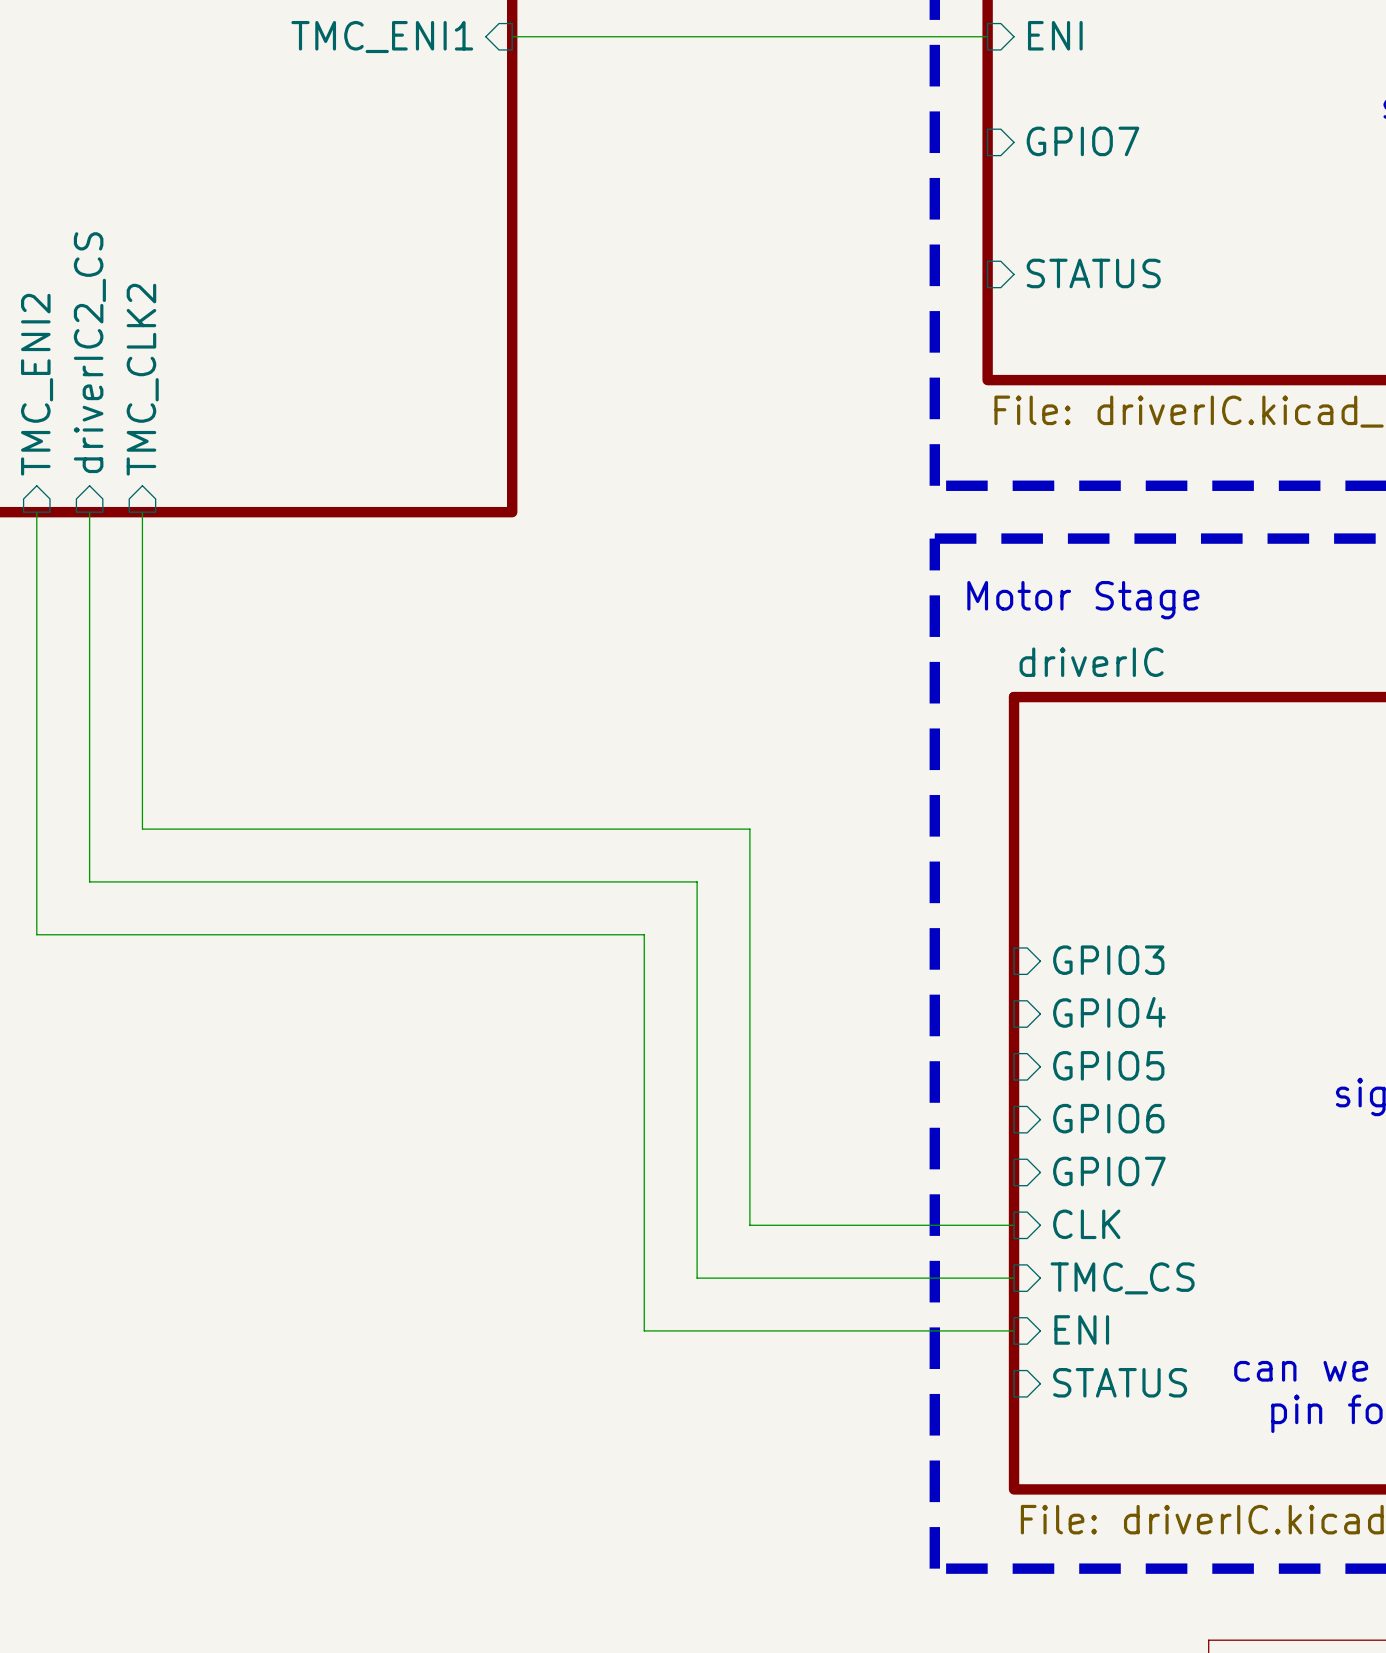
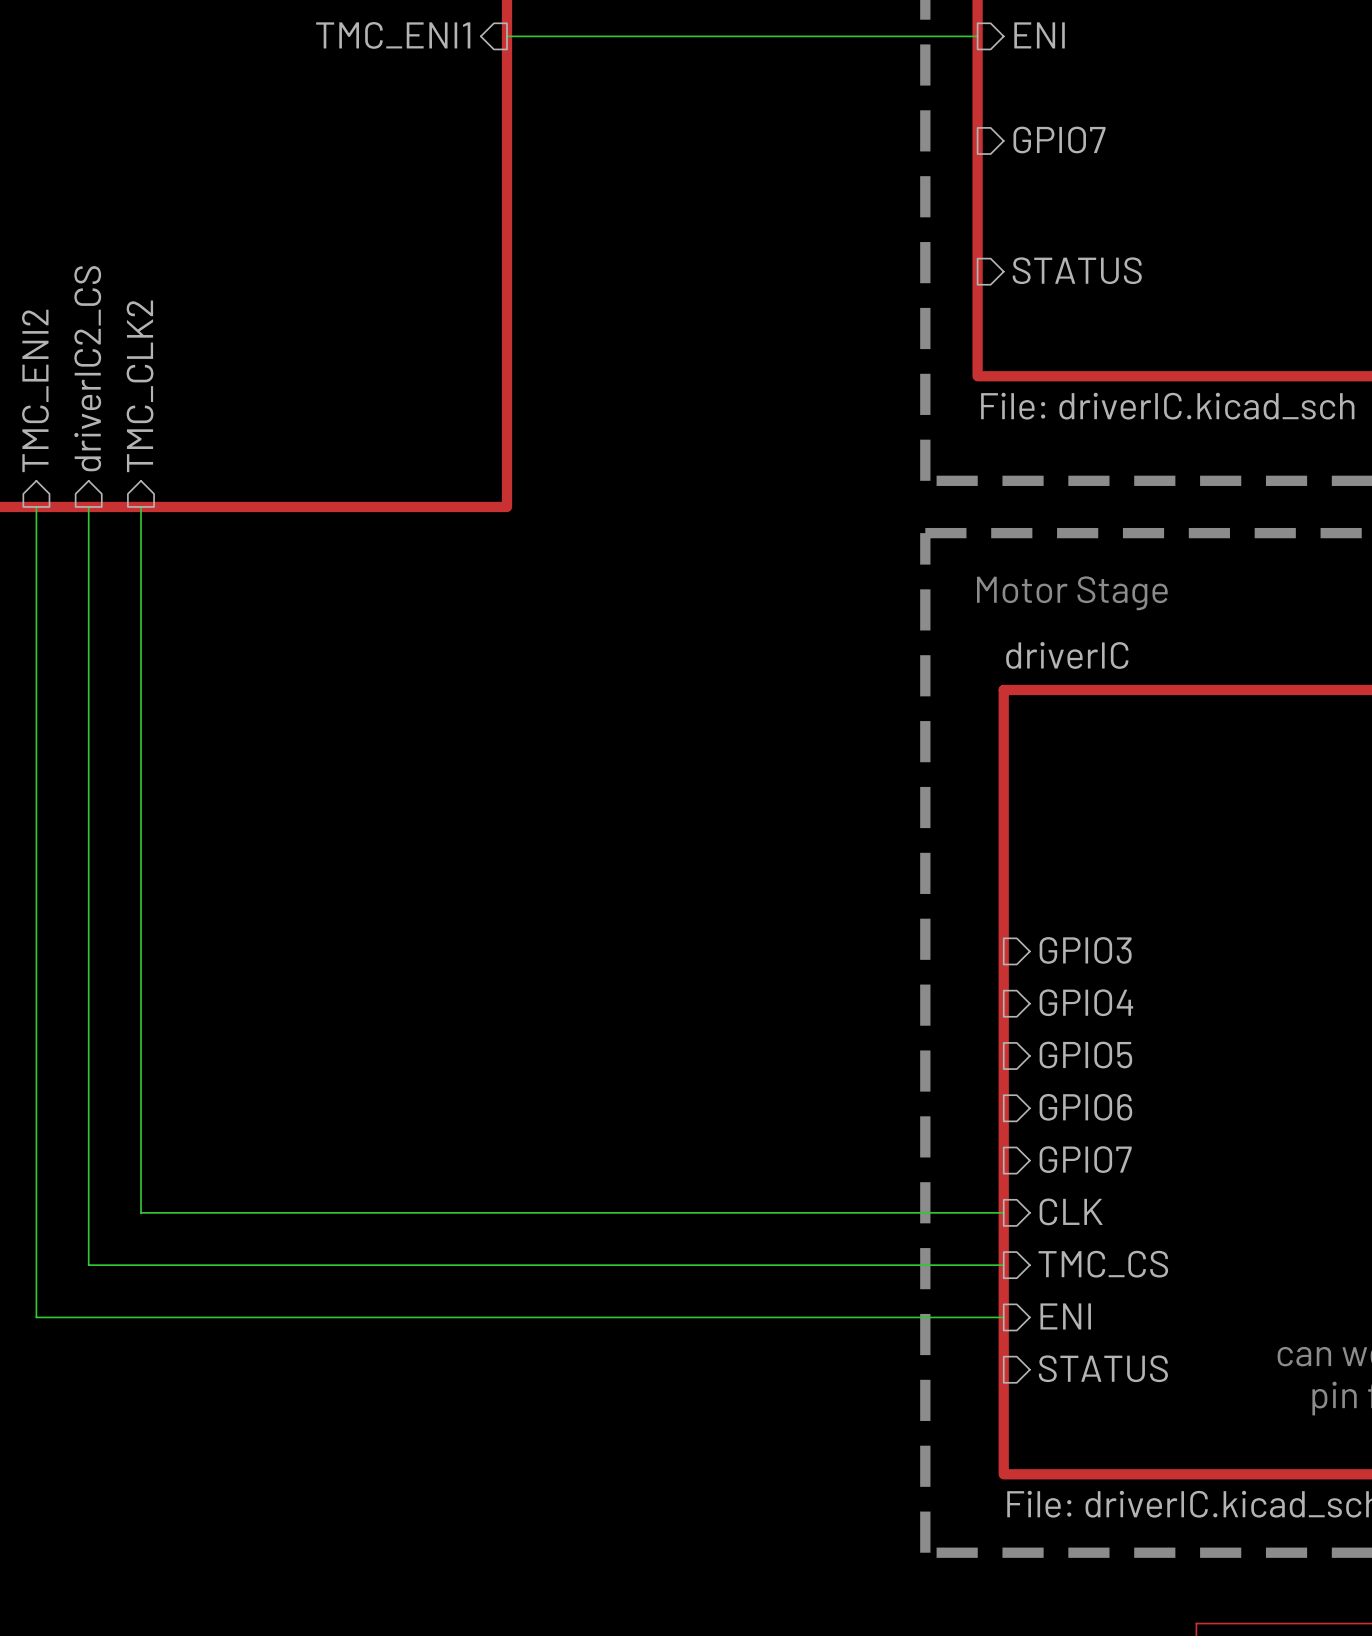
wire: (142, 829) (749, 829) (749, 1225) -> (140, 820) (140, 1212) (742, 1212)
wire: (89, 881) (697, 881) (697, 1278) -> (88, 872) (88, 1265) (690, 1265)
wire: (36, 934) (644, 934) (644, 1330) -> (36, 925) (36, 1317) (637, 1317)

